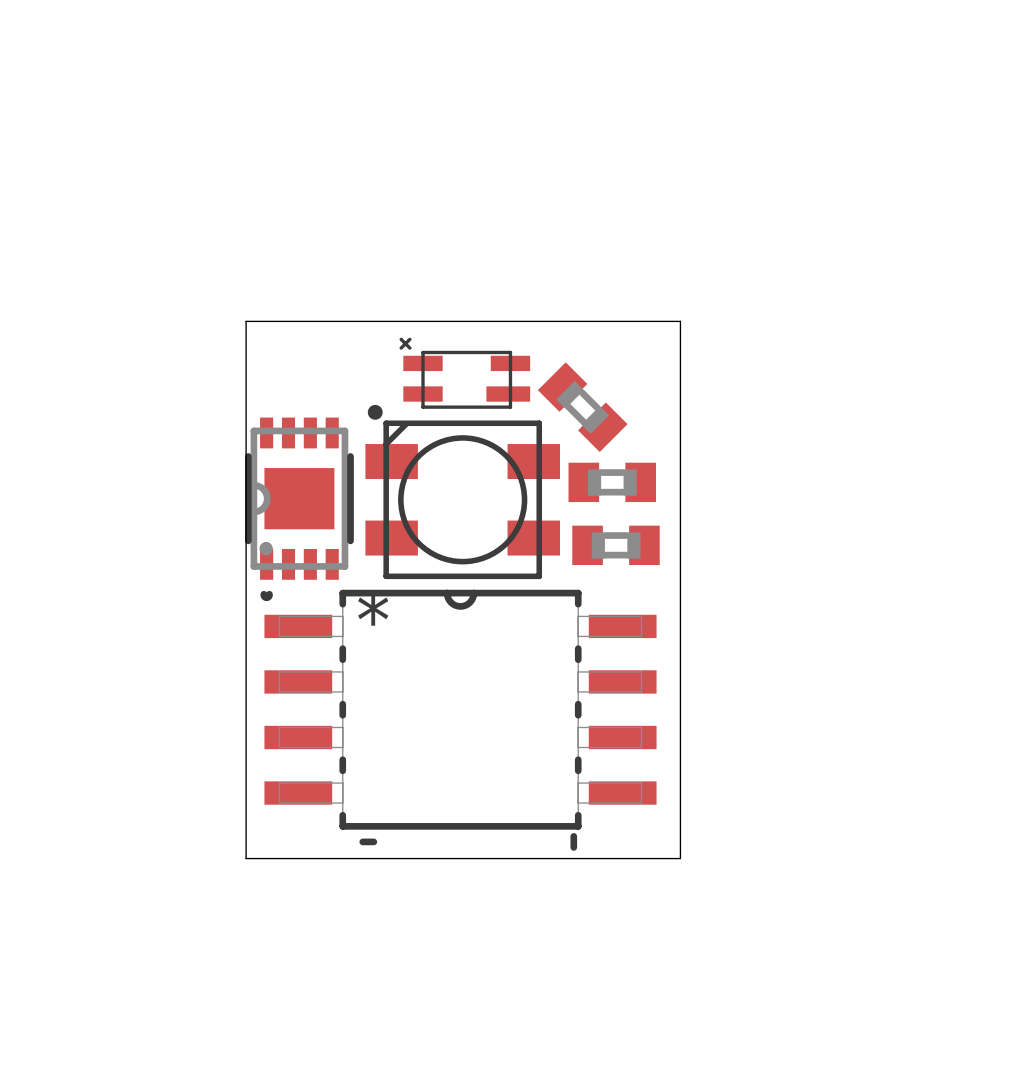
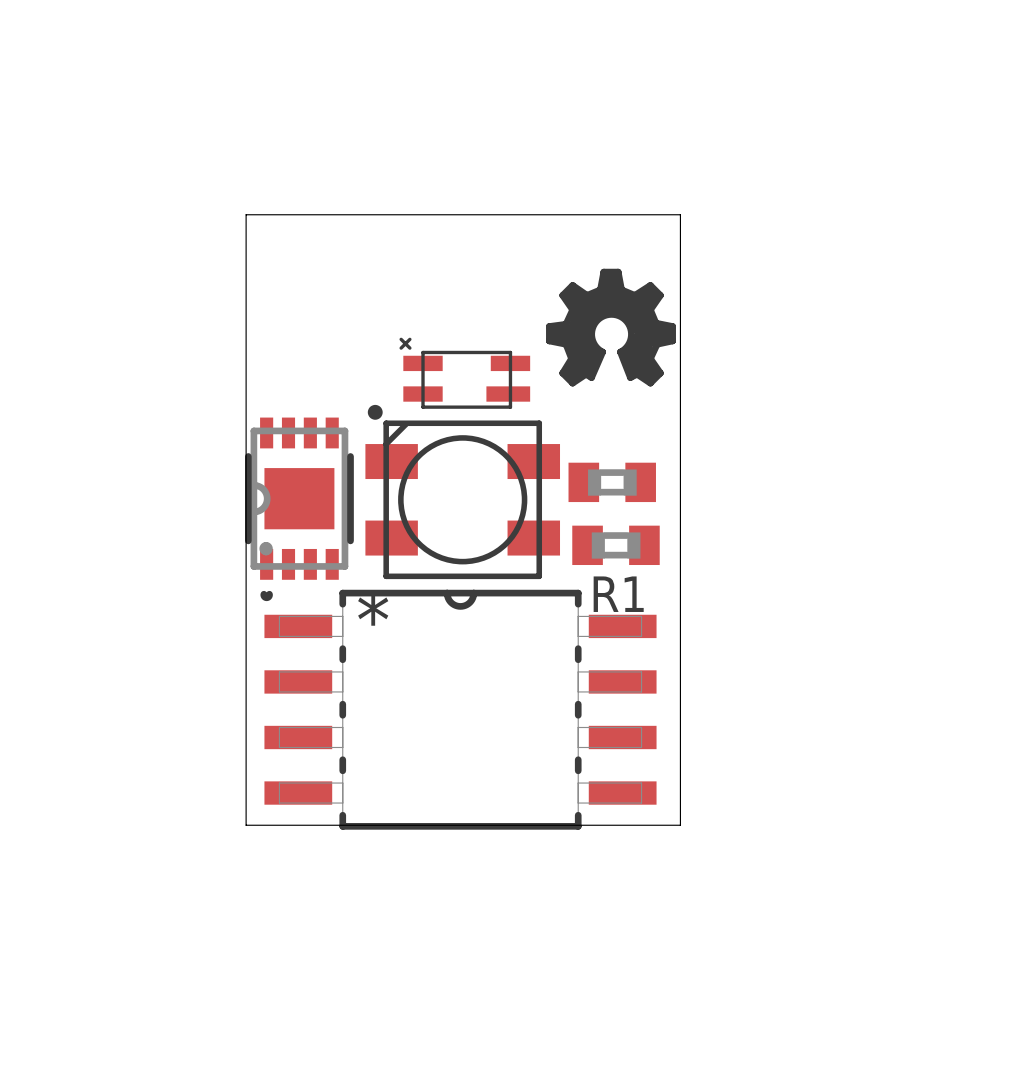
drawing: none -> [546, 268, 676, 387]
board edge: (246, 321) (680, 321) -> (246, 321) (246, 214) (680, 214) (680, 321)
part: (582, 407) -> none
R1 name: none -> R1 (618, 594)
board edge: (246, 825) (246, 858) (680, 858) (680, 825) -> (246, 825) (680, 825)
line: (573, 836) (573, 847) -> none
line: (362, 841) (373, 841) -> none

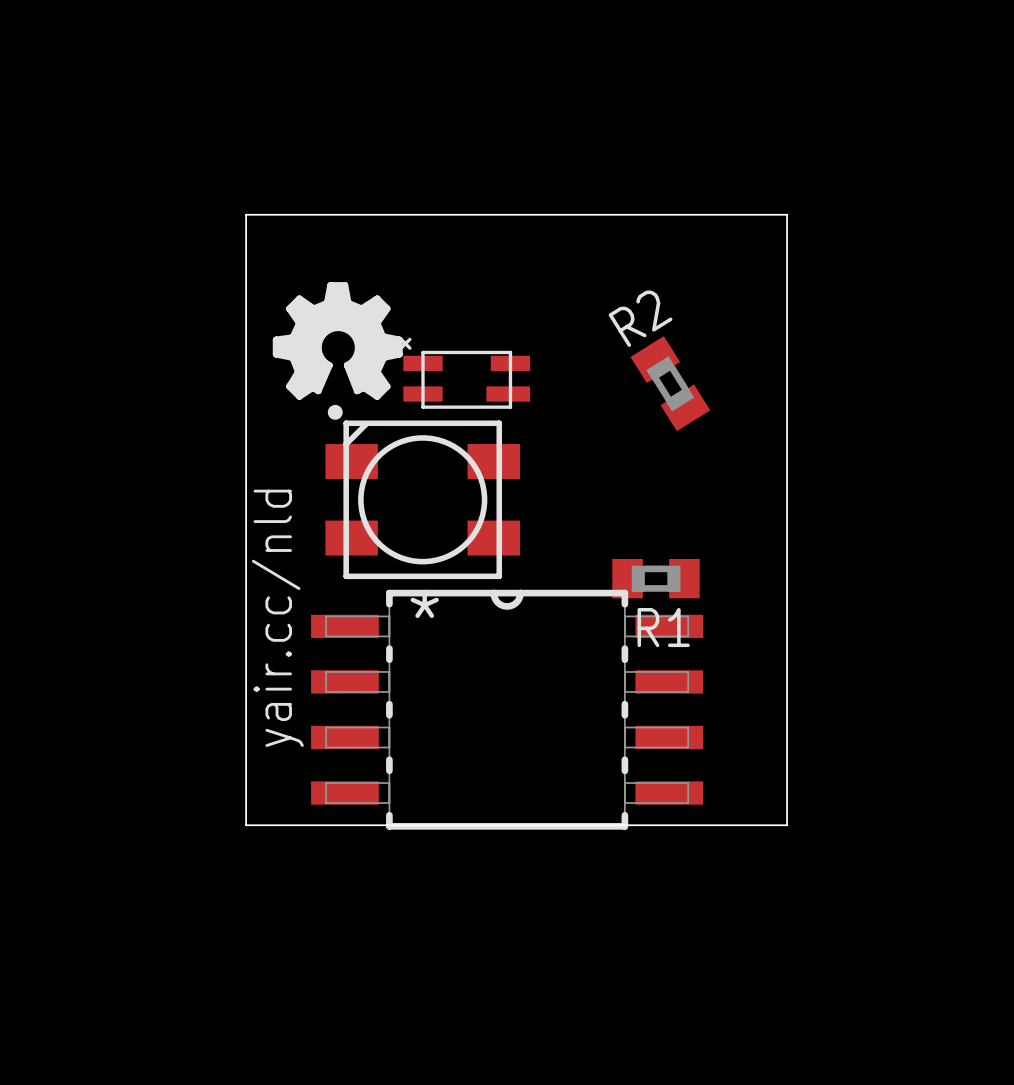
board edge: (680, 214) (680, 825) -> (680, 214) (787, 214) (787, 825) (680, 825)
drawing position: (611, 327) -> (337, 340)
R2: none -> (670, 383)
part: (612, 482) -> none
part position: (462, 491) -> (422, 491)
part: (299, 509) -> none
R1 position: (616, 545) -> (655, 578)
text: none -> yair.cc/nld (277, 618)
part position: (460, 709) -> (507, 709)

